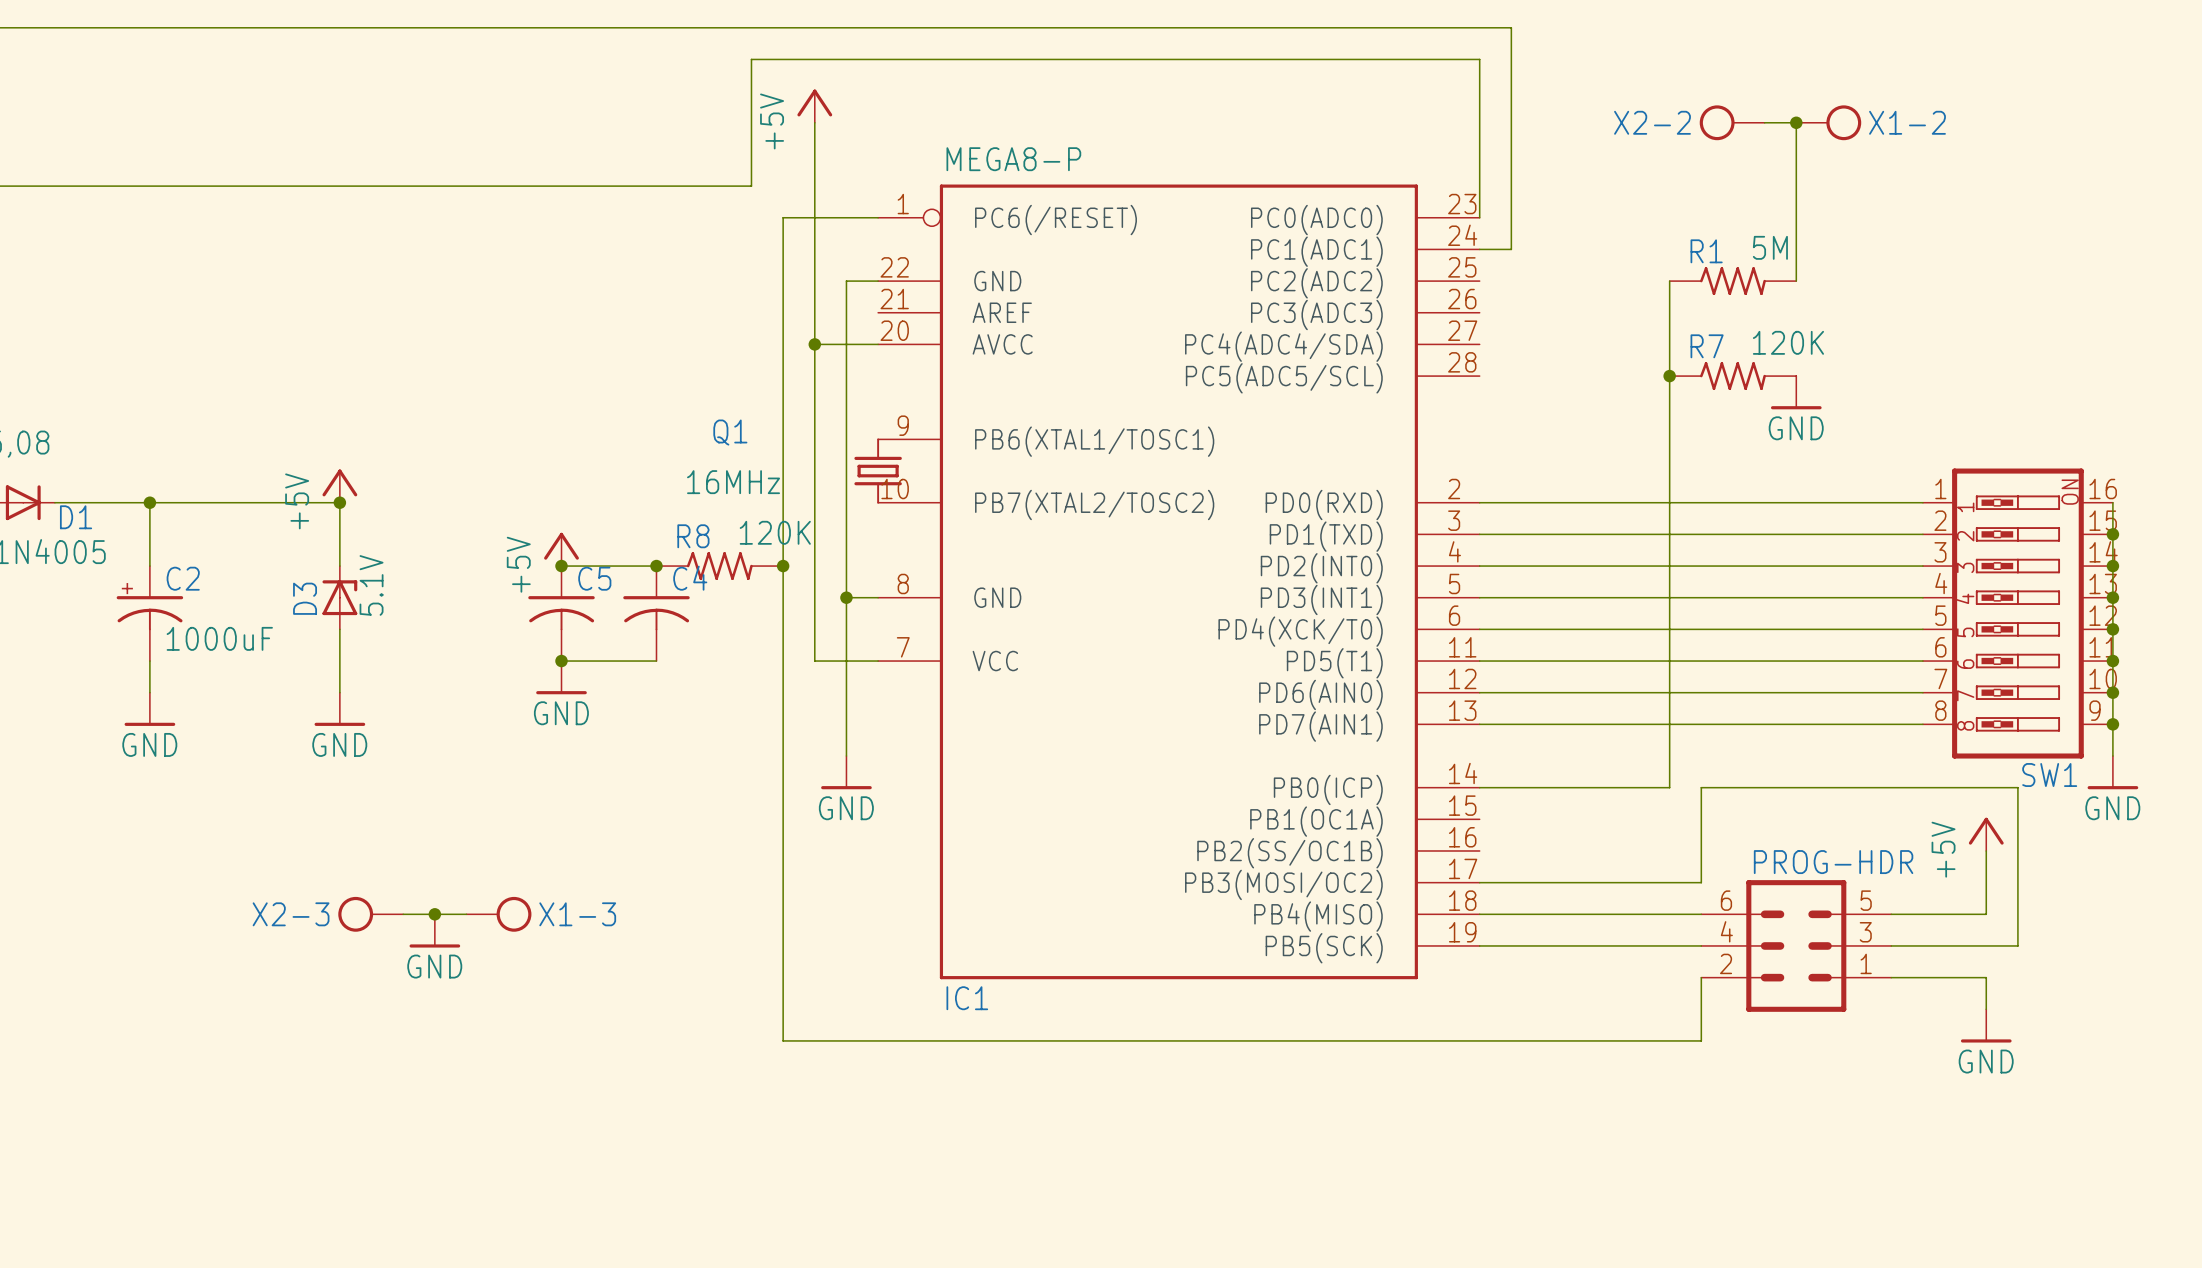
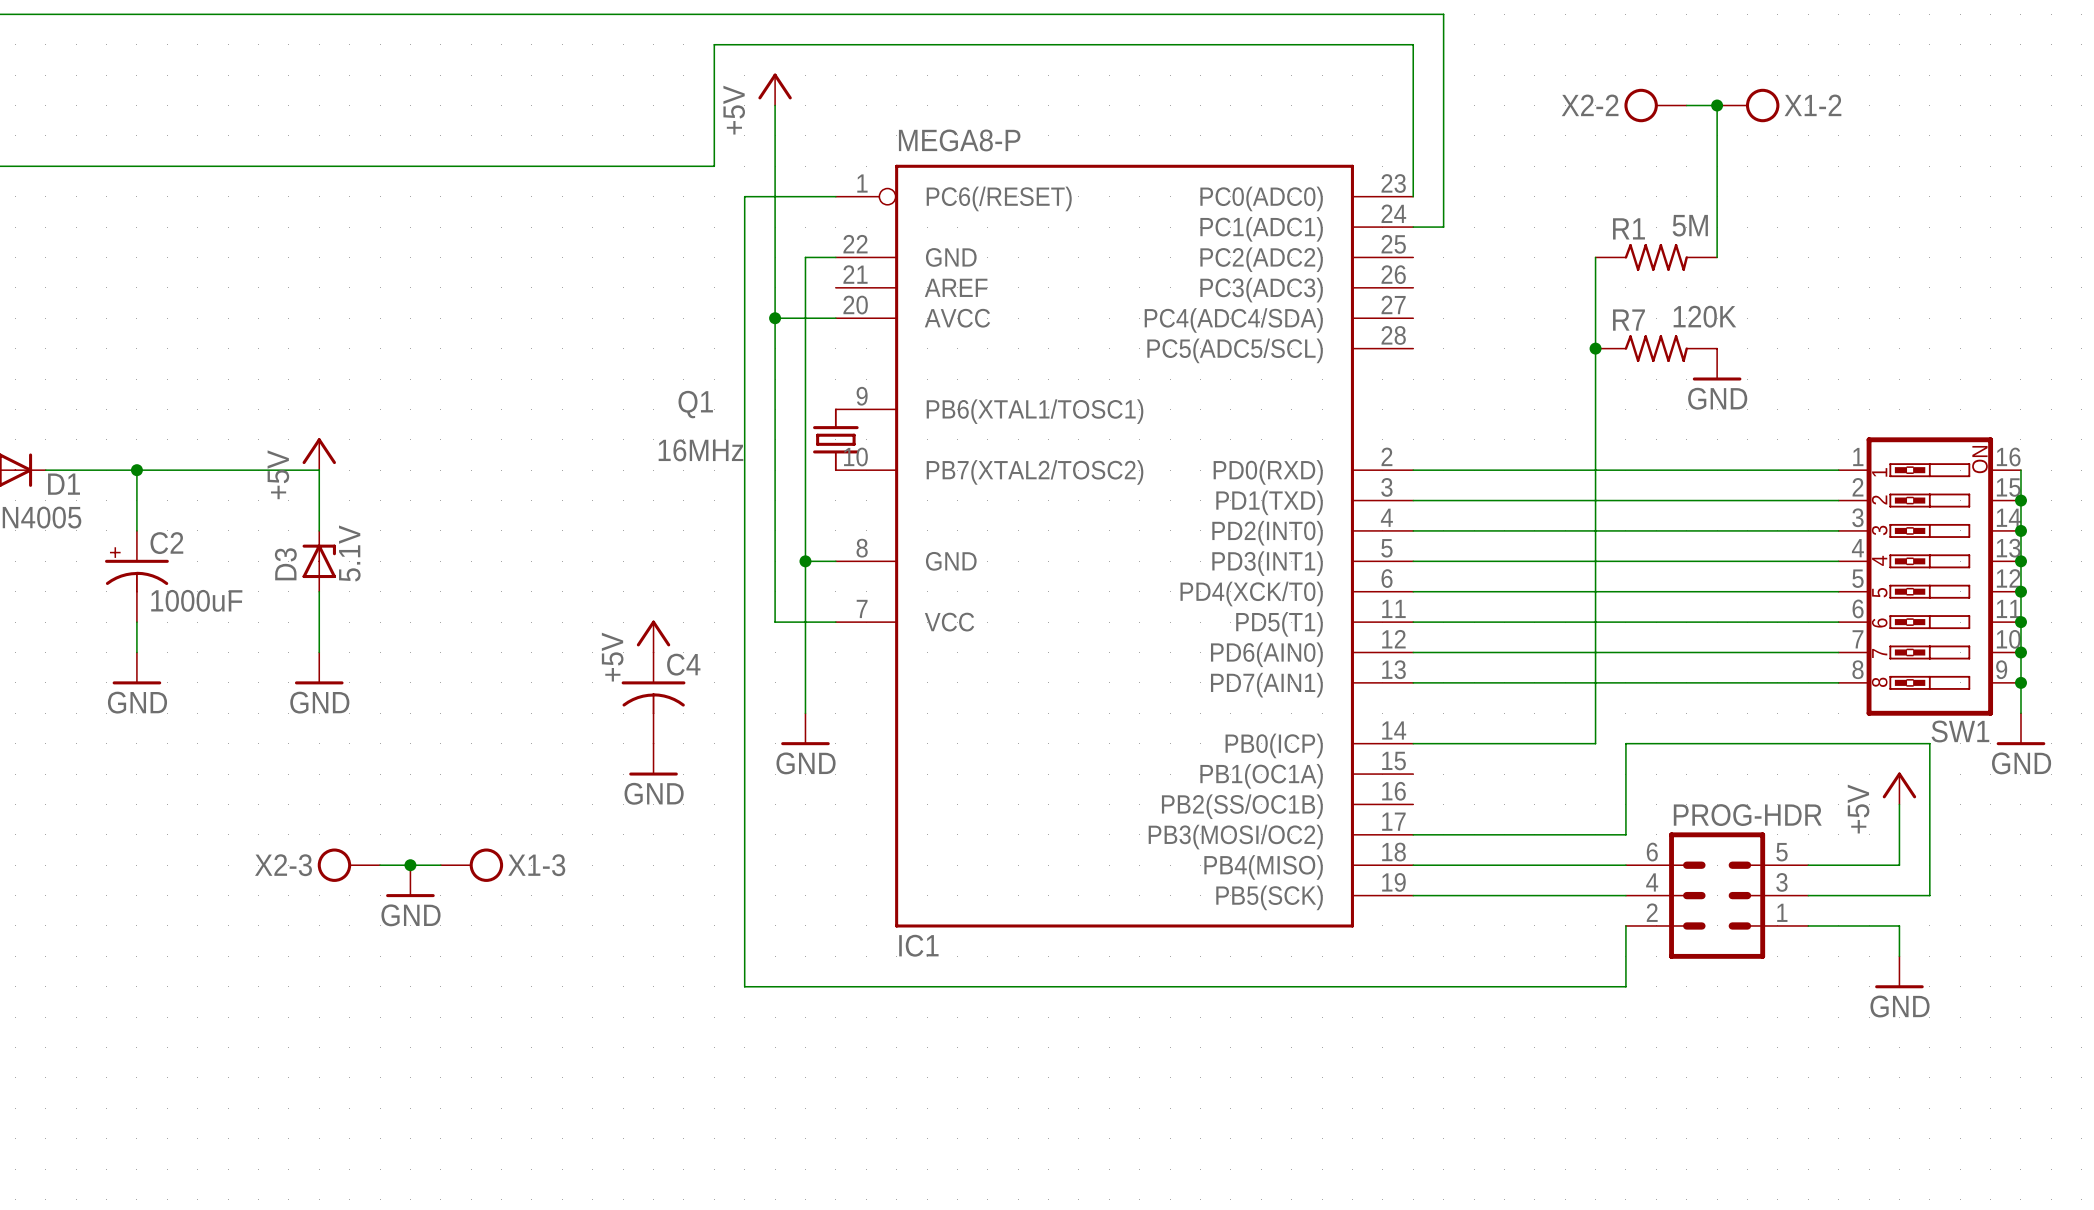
junction: (339, 502) -> none
power symbol position: +5V (561, 549) -> +5V (653, 636)
wire: (561, 566) (656, 566) -> none
junction: (561, 566) -> none
junction: (656, 566) -> none
R8: 120K (719, 566) -> none
junction: (783, 566) -> none
C5: (561, 613) -> none
C4 position: (656, 613) -> (653, 698)
wire: (561, 661) (656, 661) -> none
junction: (561, 661) -> none
power symbol position: GND (561, 677) -> GND (653, 759)

